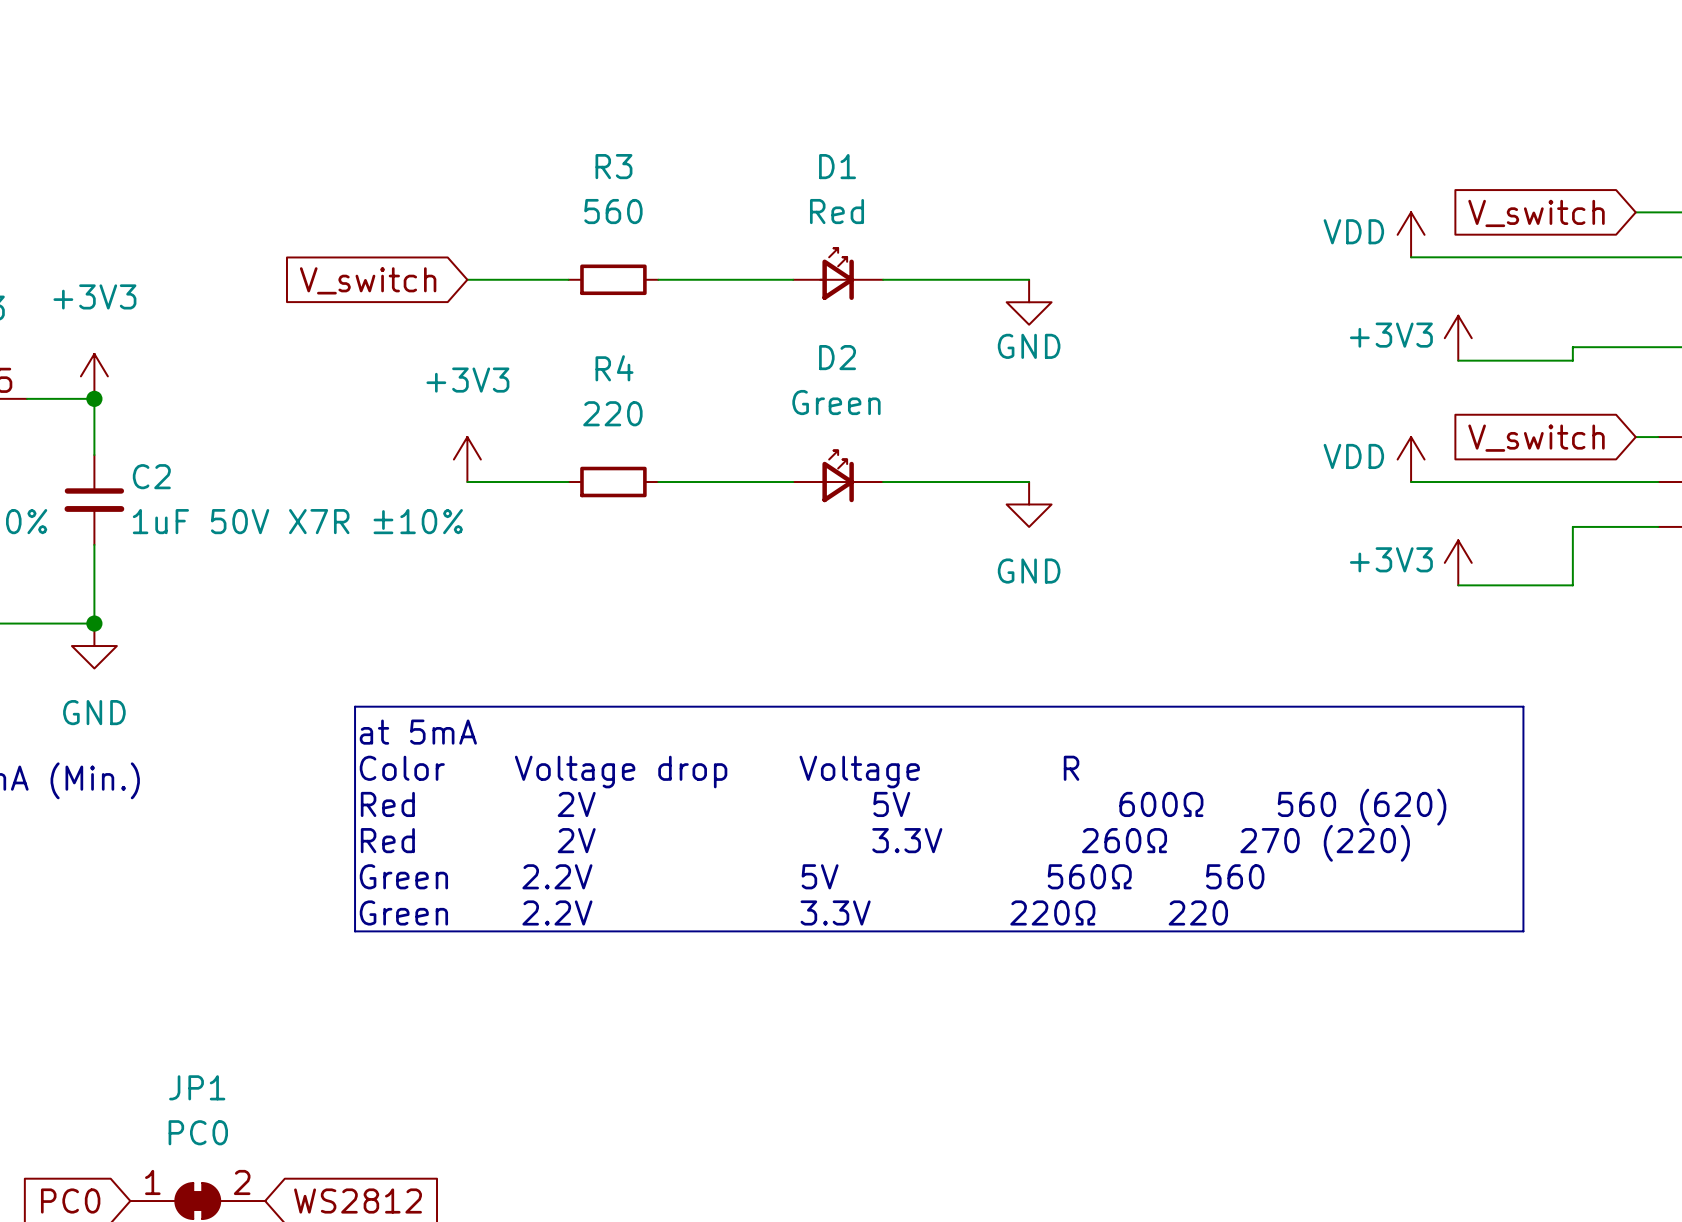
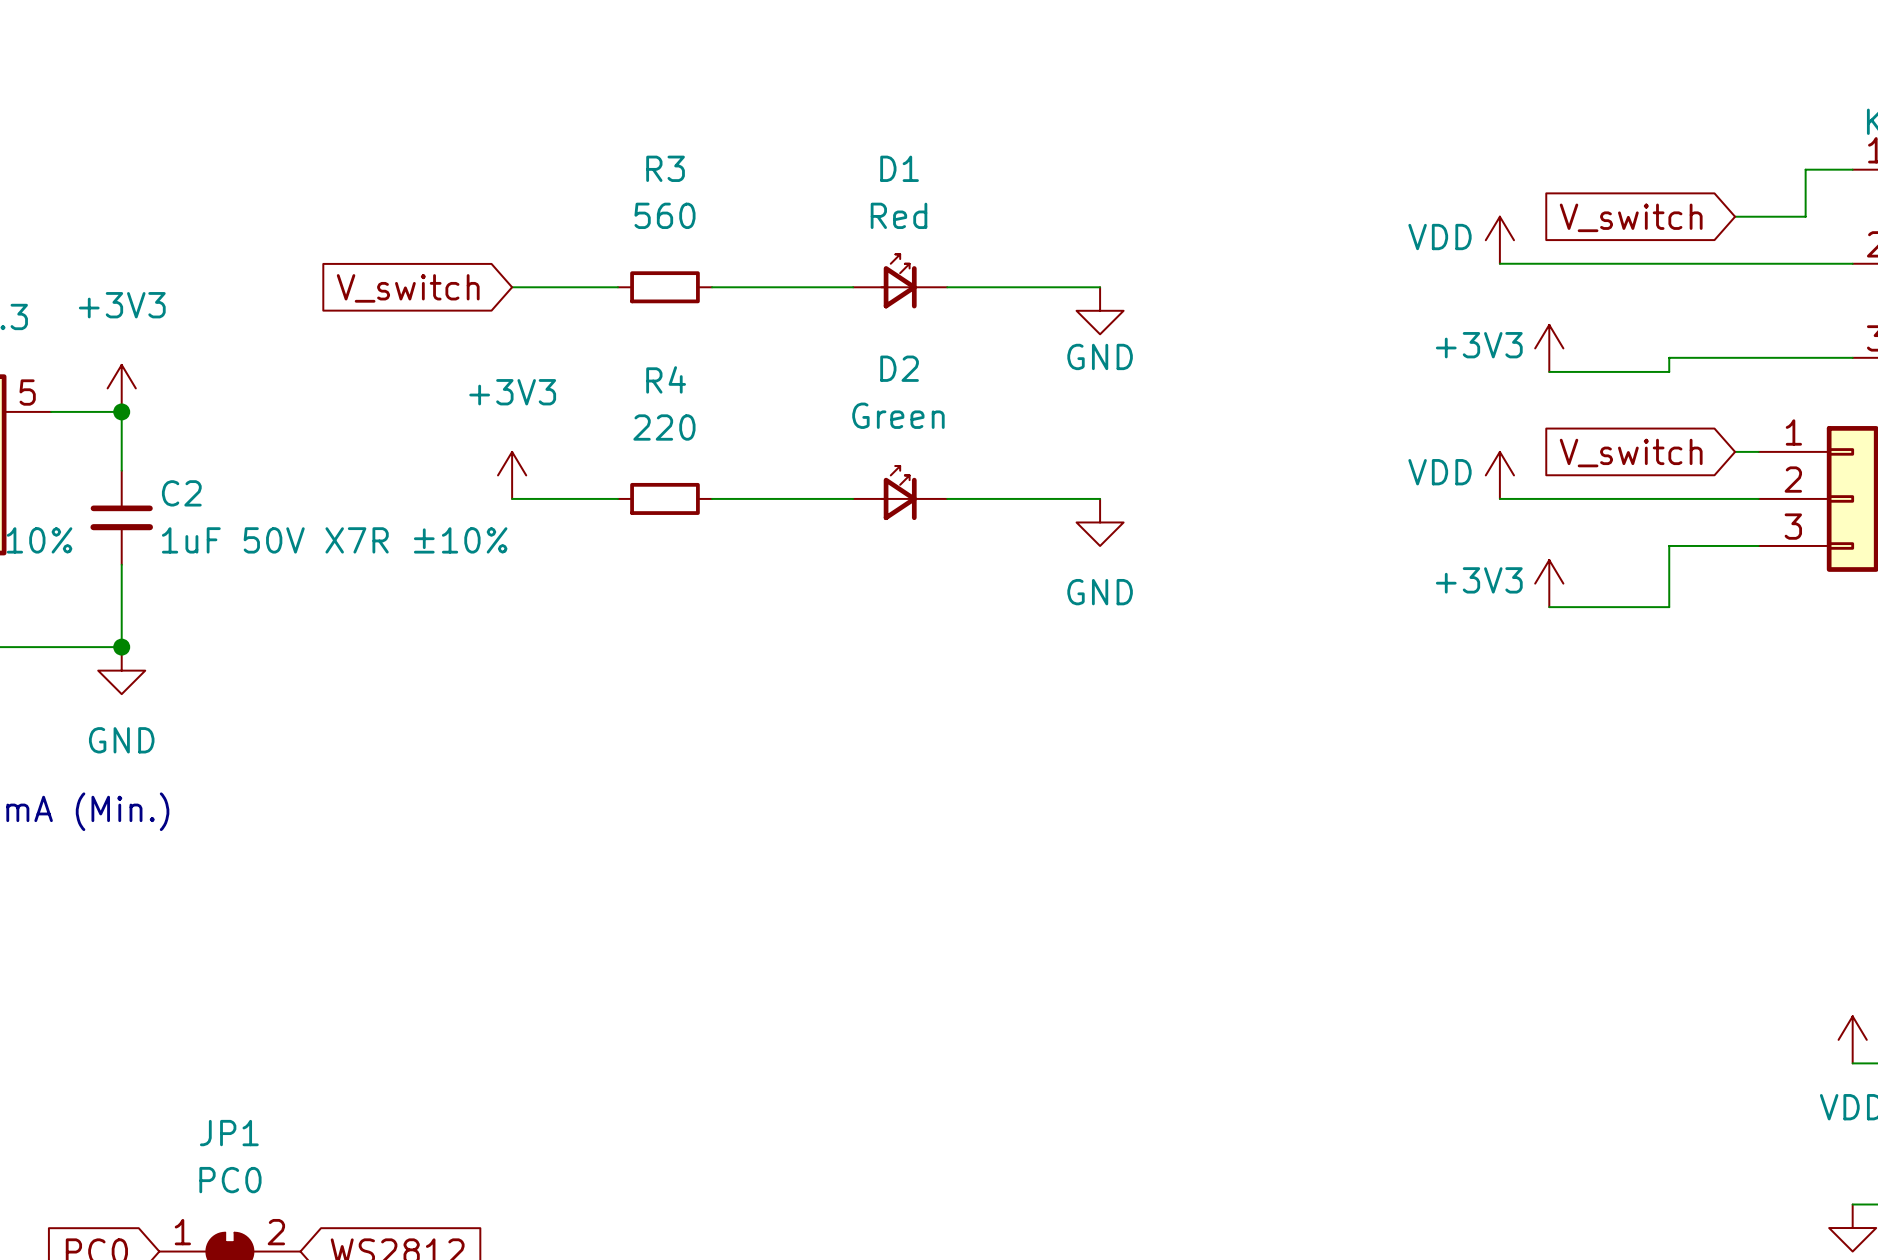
line: (355, 706) (355, 931) (1523, 931) (1523, 706) (355, 706) -> none
text: at 5mA (418, 732) -> none
text: Color Voltage drop Voltage R (719, 772) -> none
text: Red 2V 5V 600Ω 560 (620) (903, 807) -> none
text: Red 2V 3.3V 260Ω 270 (220) (885, 843) -> none
text: Green 2.2V 5V 560Ω 560 (812, 876) -> none
text: Green 2.2V 3.3V 220Ω 220 (793, 912) -> none

